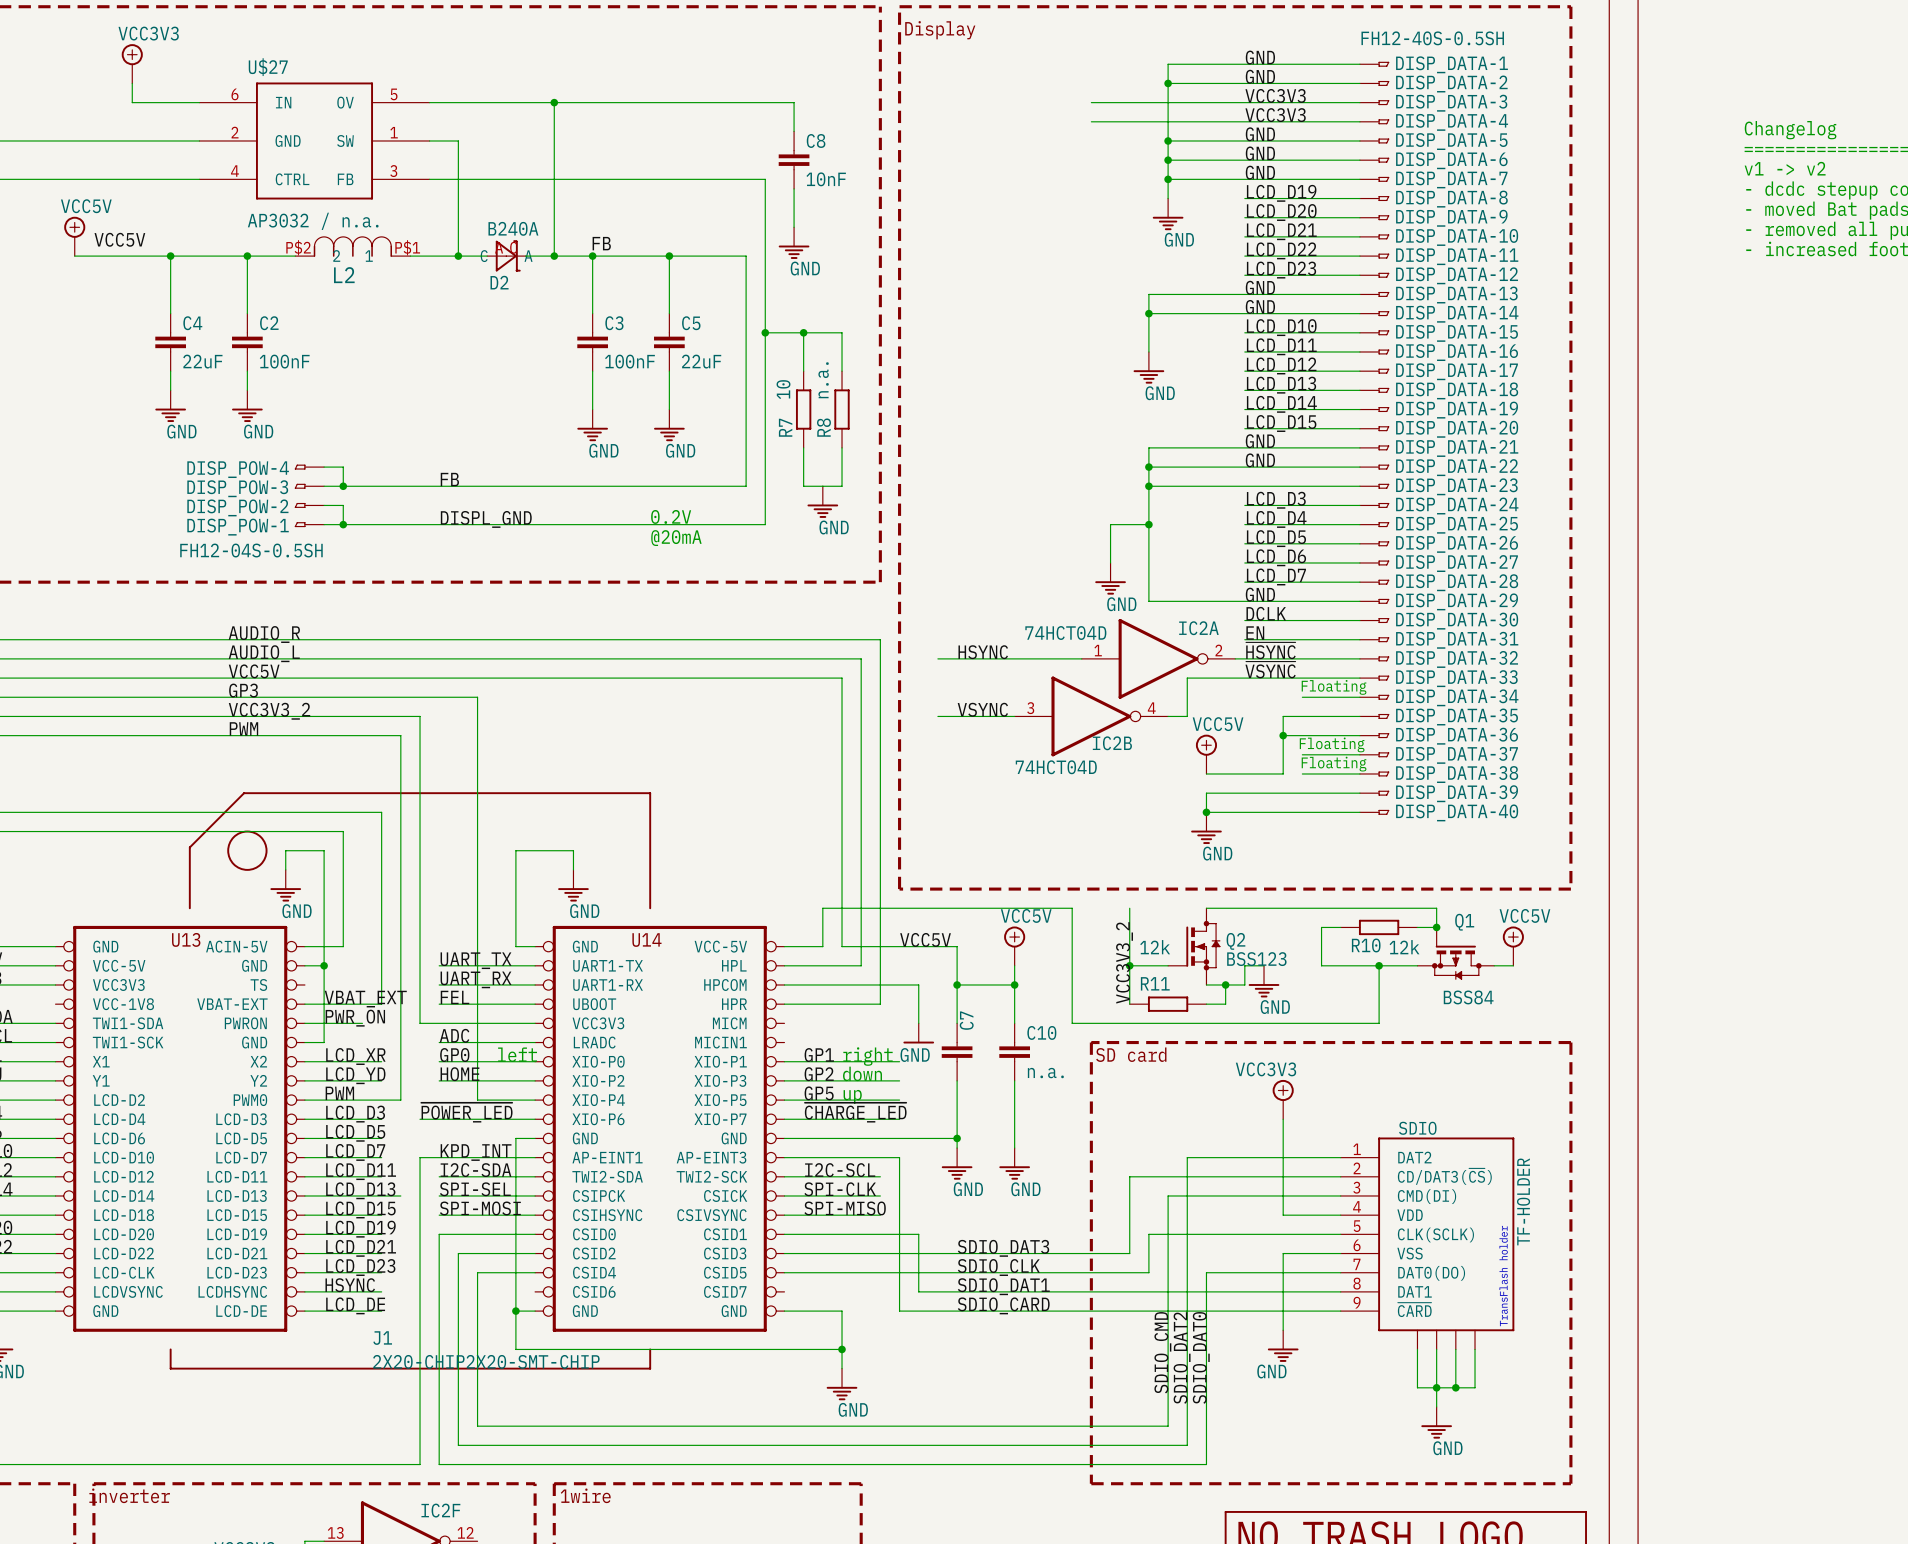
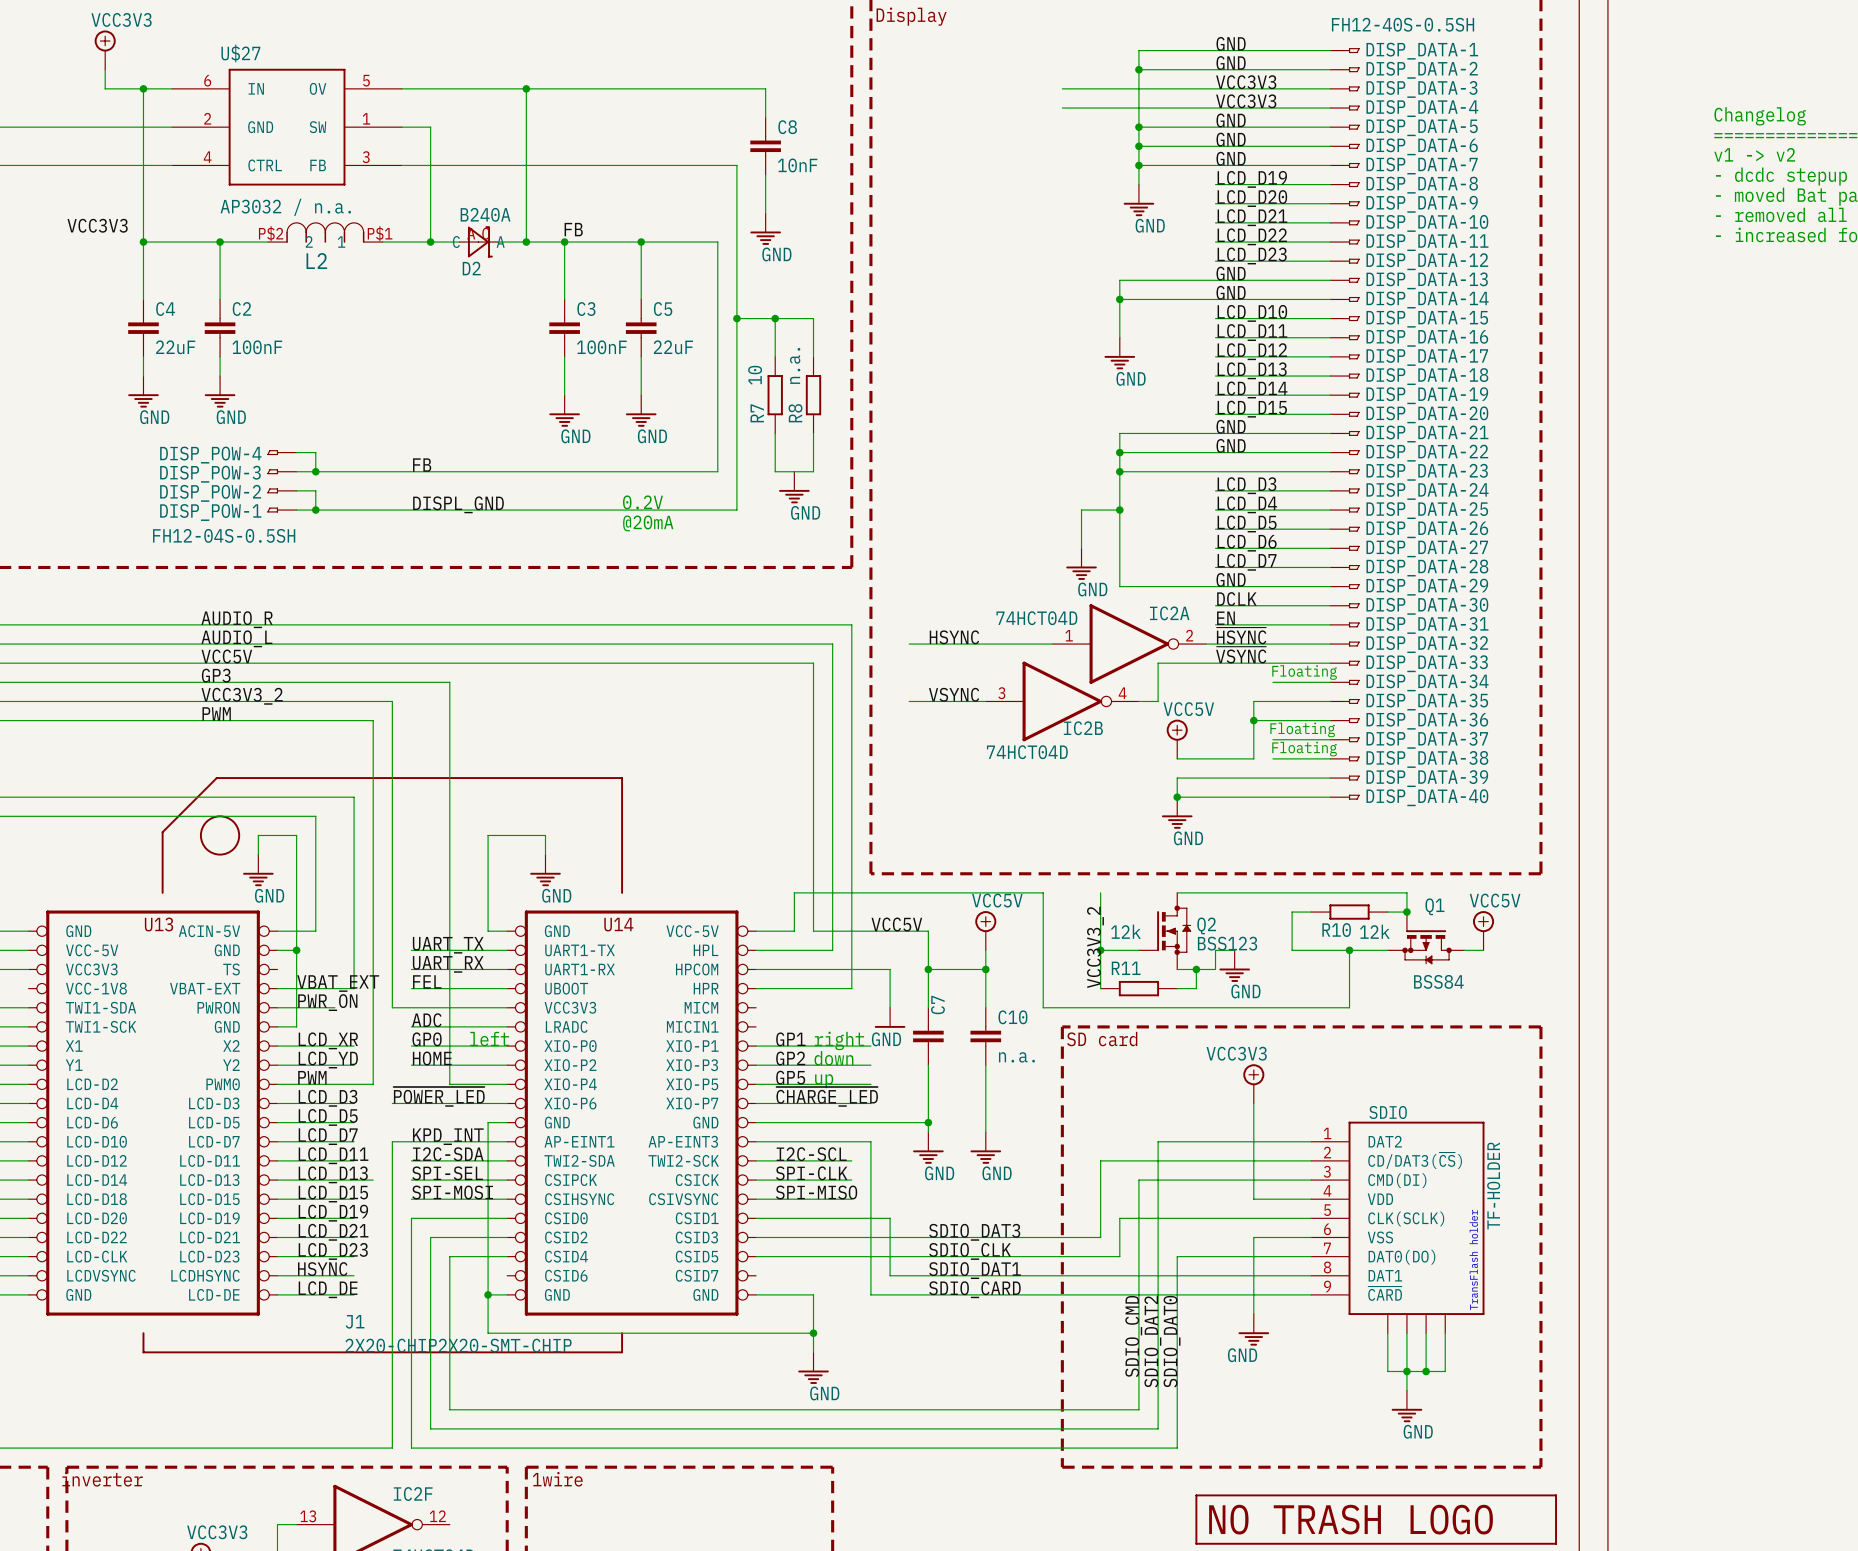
junction: none -> (143, 88)
power symbol: VCC5V (74, 236) -> none
label: VCC5V (119, 239) -> VCC3V3 (97, 225)
wire: (74, 256) (170, 256) -> (143, 88) (143, 242)

